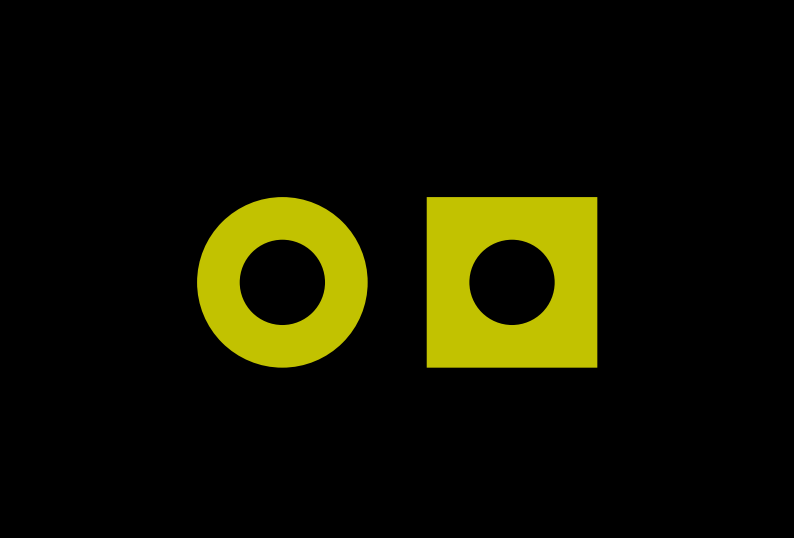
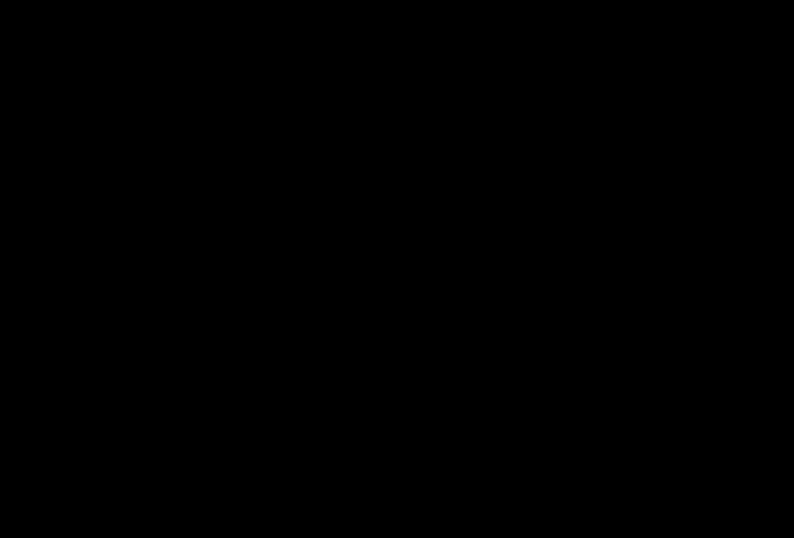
part: (397, 282) -> none

